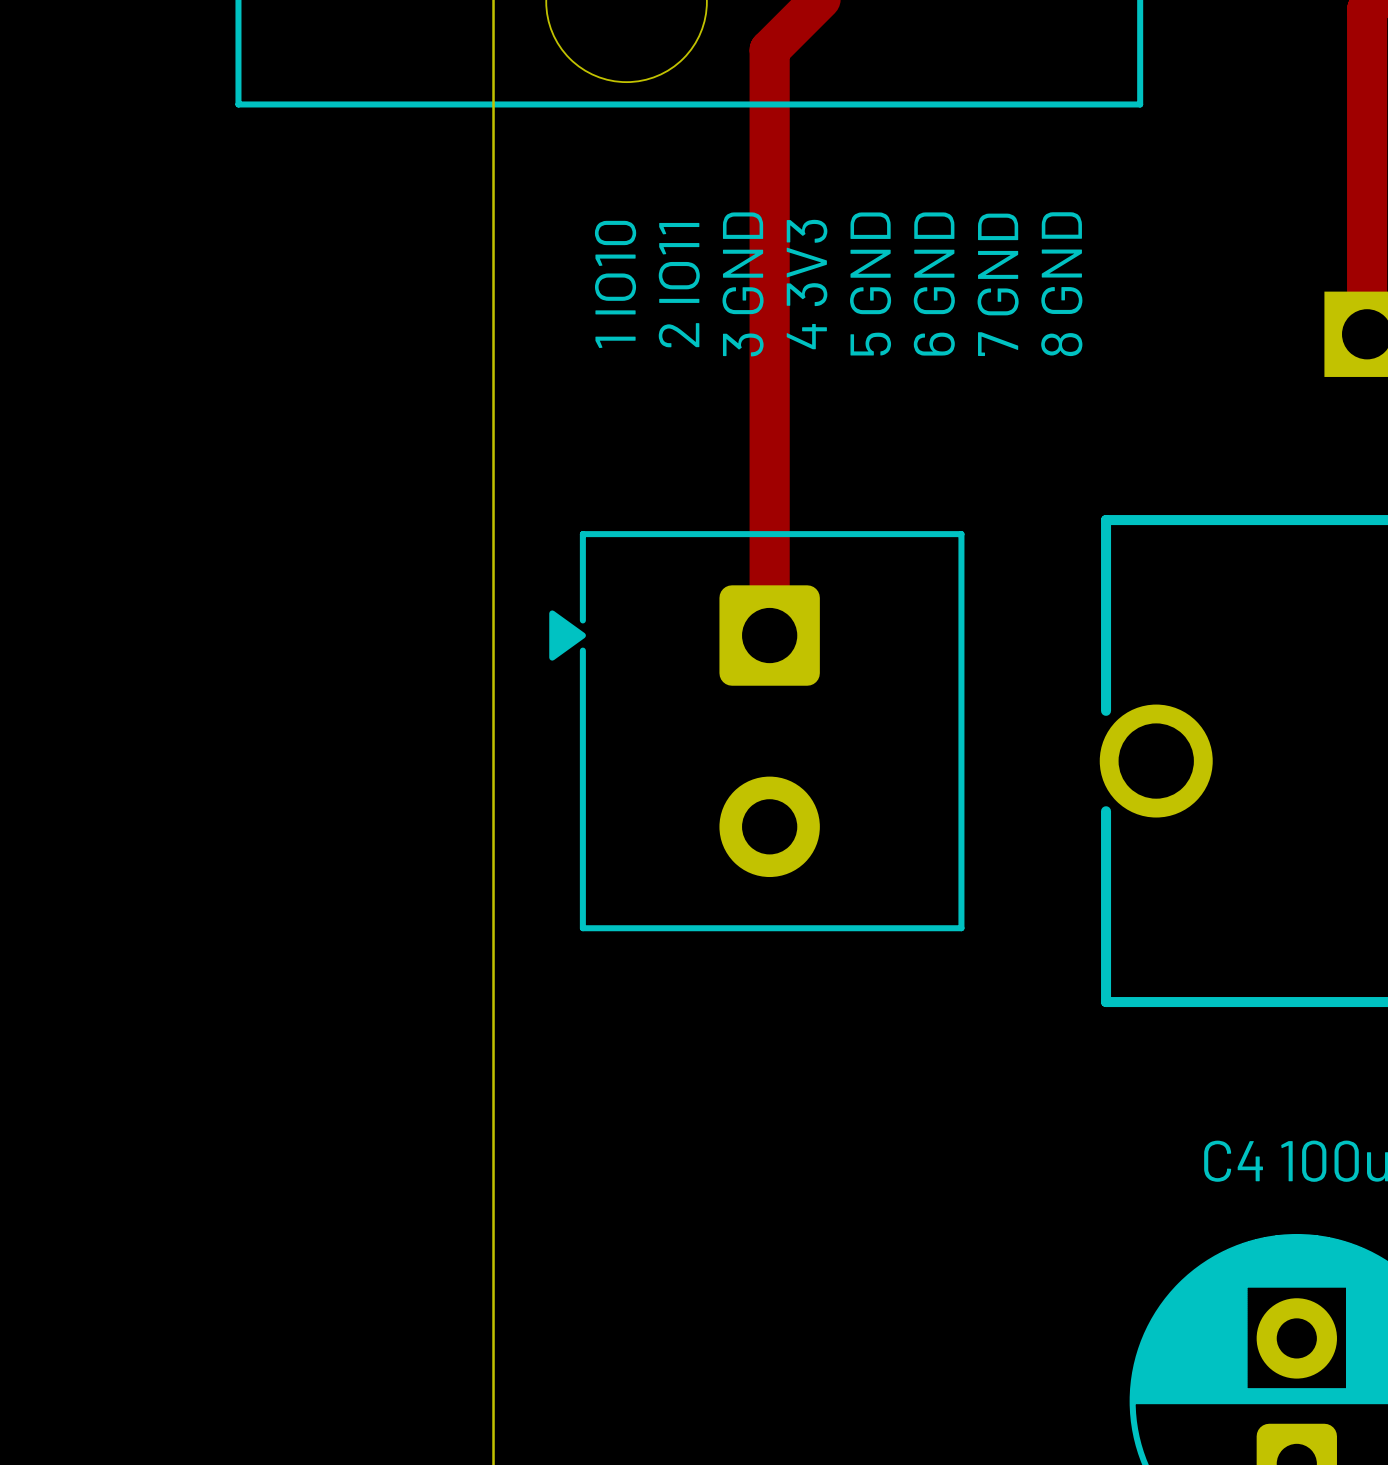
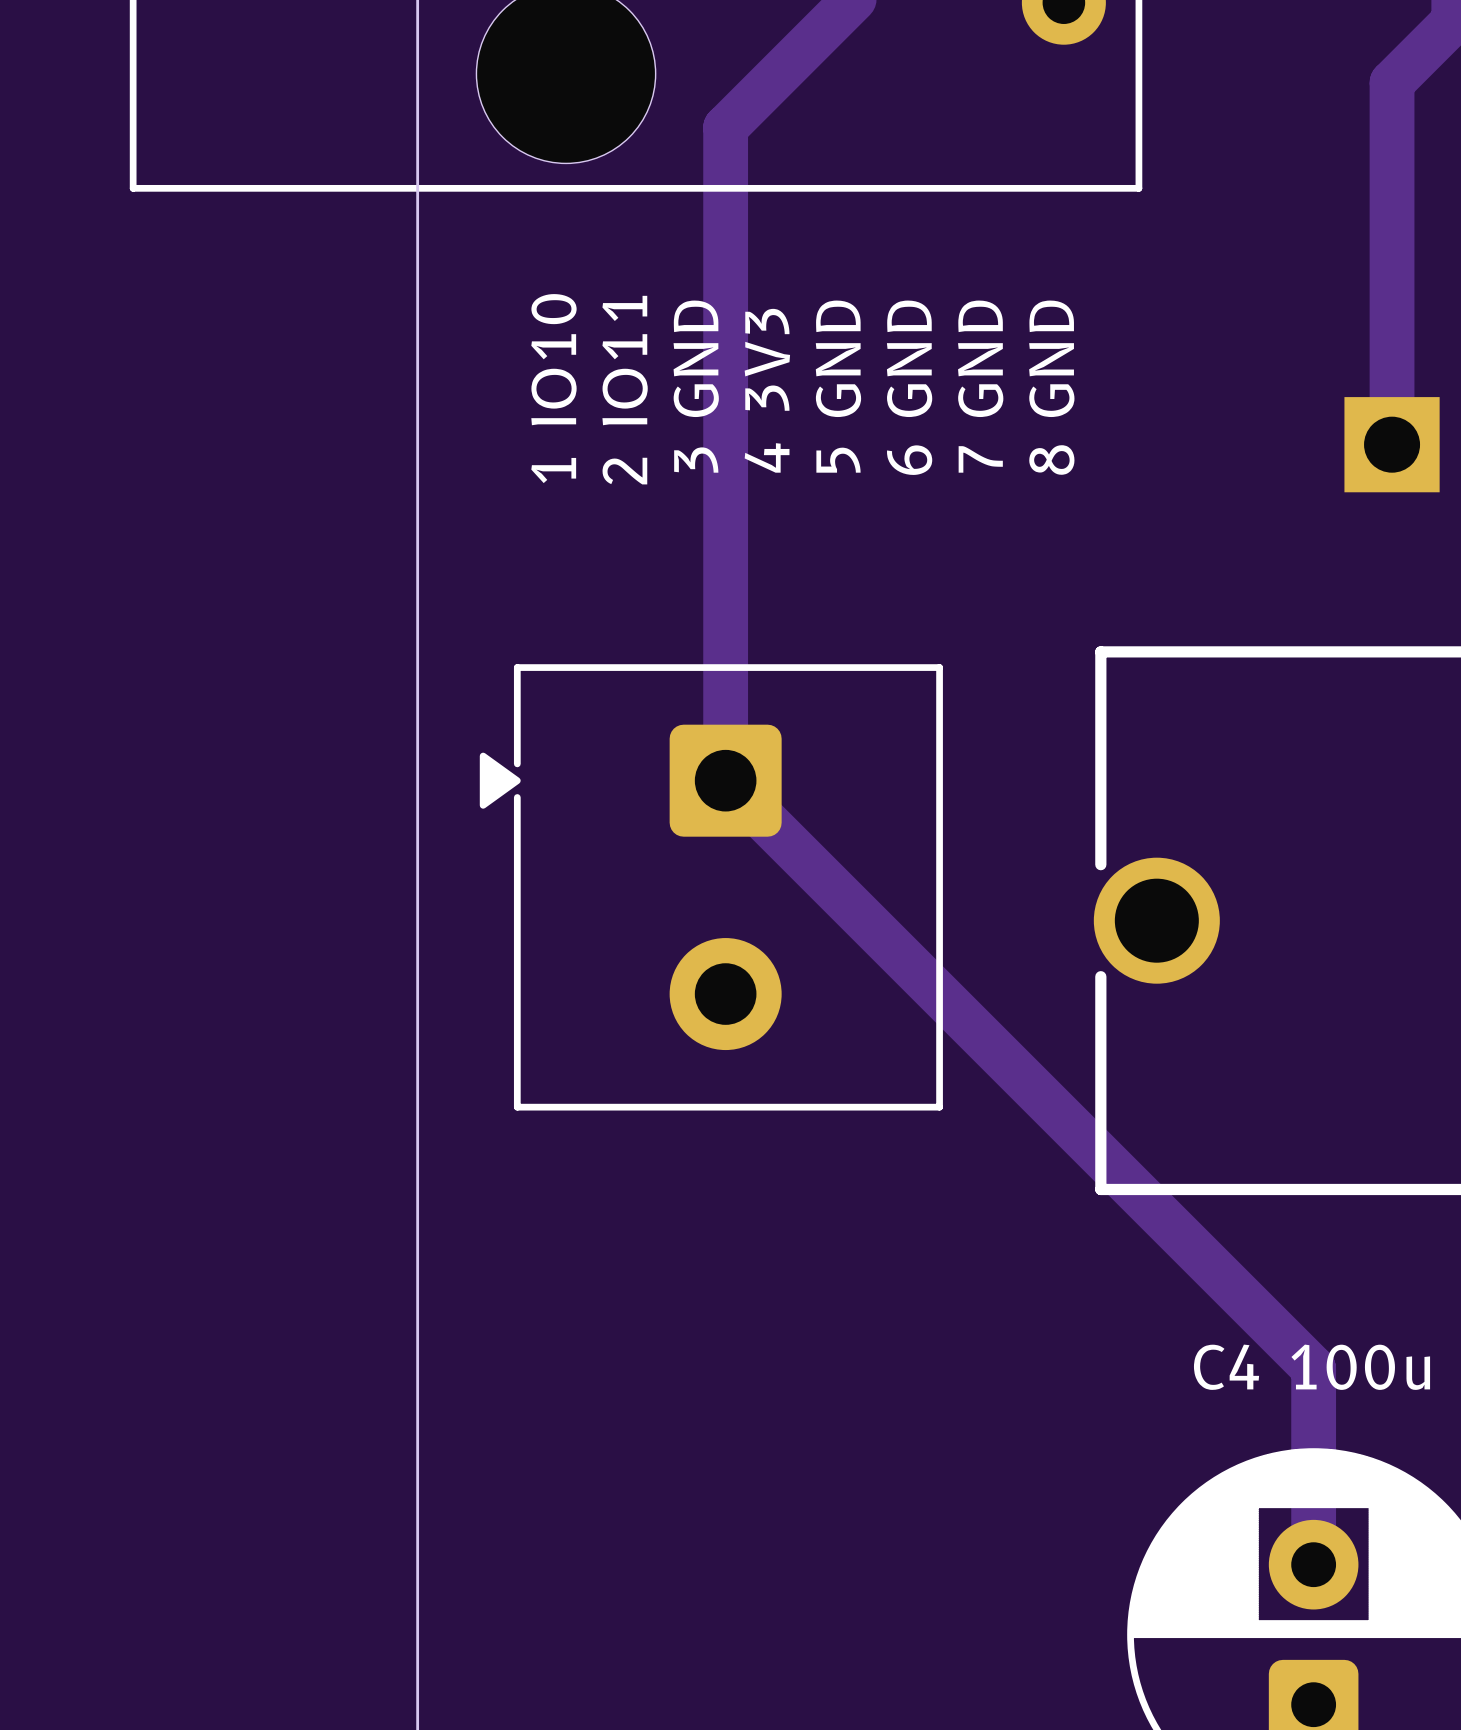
track: none -> (725, 780) (1313, 1368) (1313, 1564)

